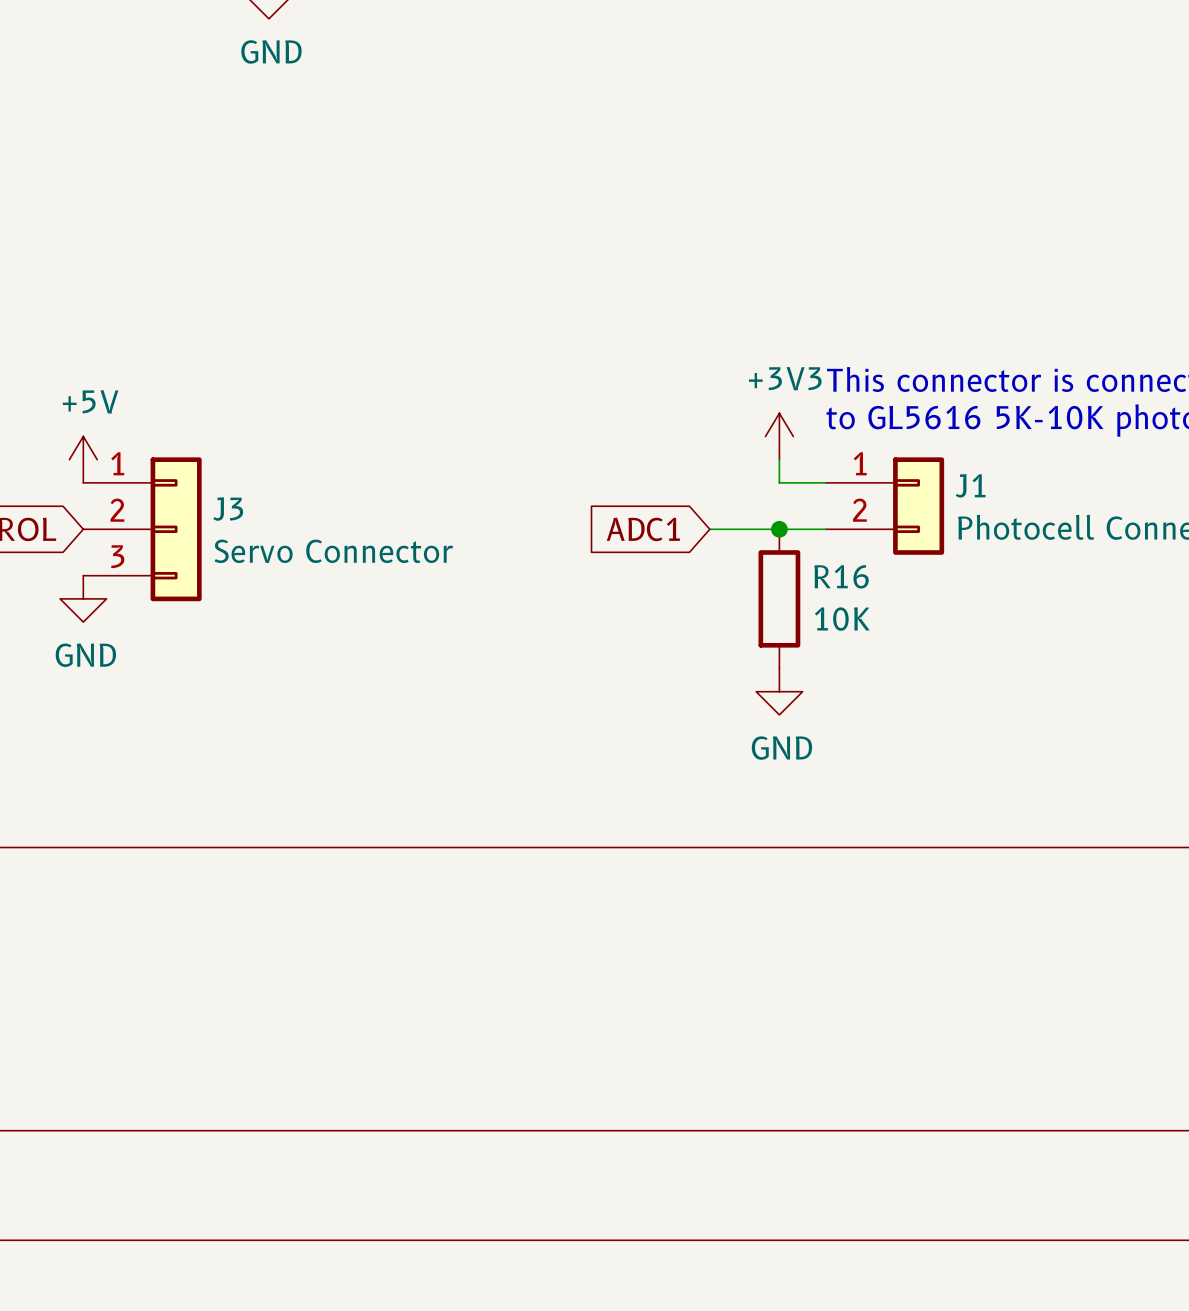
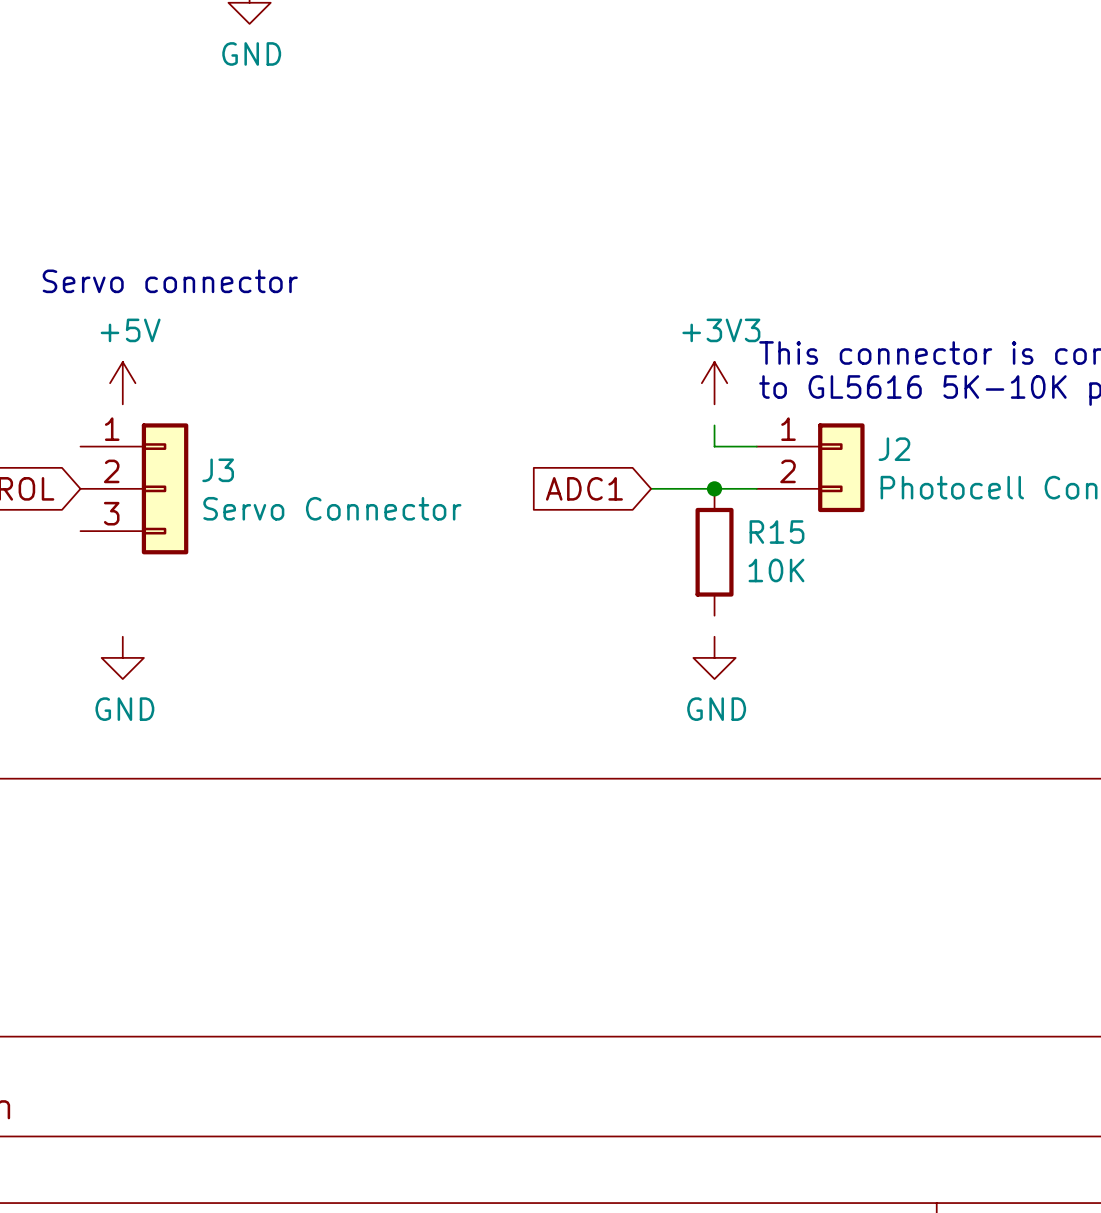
text: none -> Servo connector (170, 281)
power symbol position: +3V3 (779, 436) -> +3V3 (714, 383)
power symbol position: +5V (83, 459) -> +5V (122, 383)
J1 name: J1 (970, 485) -> J2 (894, 449)
R16 name: R16 (841, 576) -> R15 (776, 532)
power symbol position: GND (83, 598) -> GND (122, 657)
power symbol position: GND (779, 691) -> GND (714, 657)

